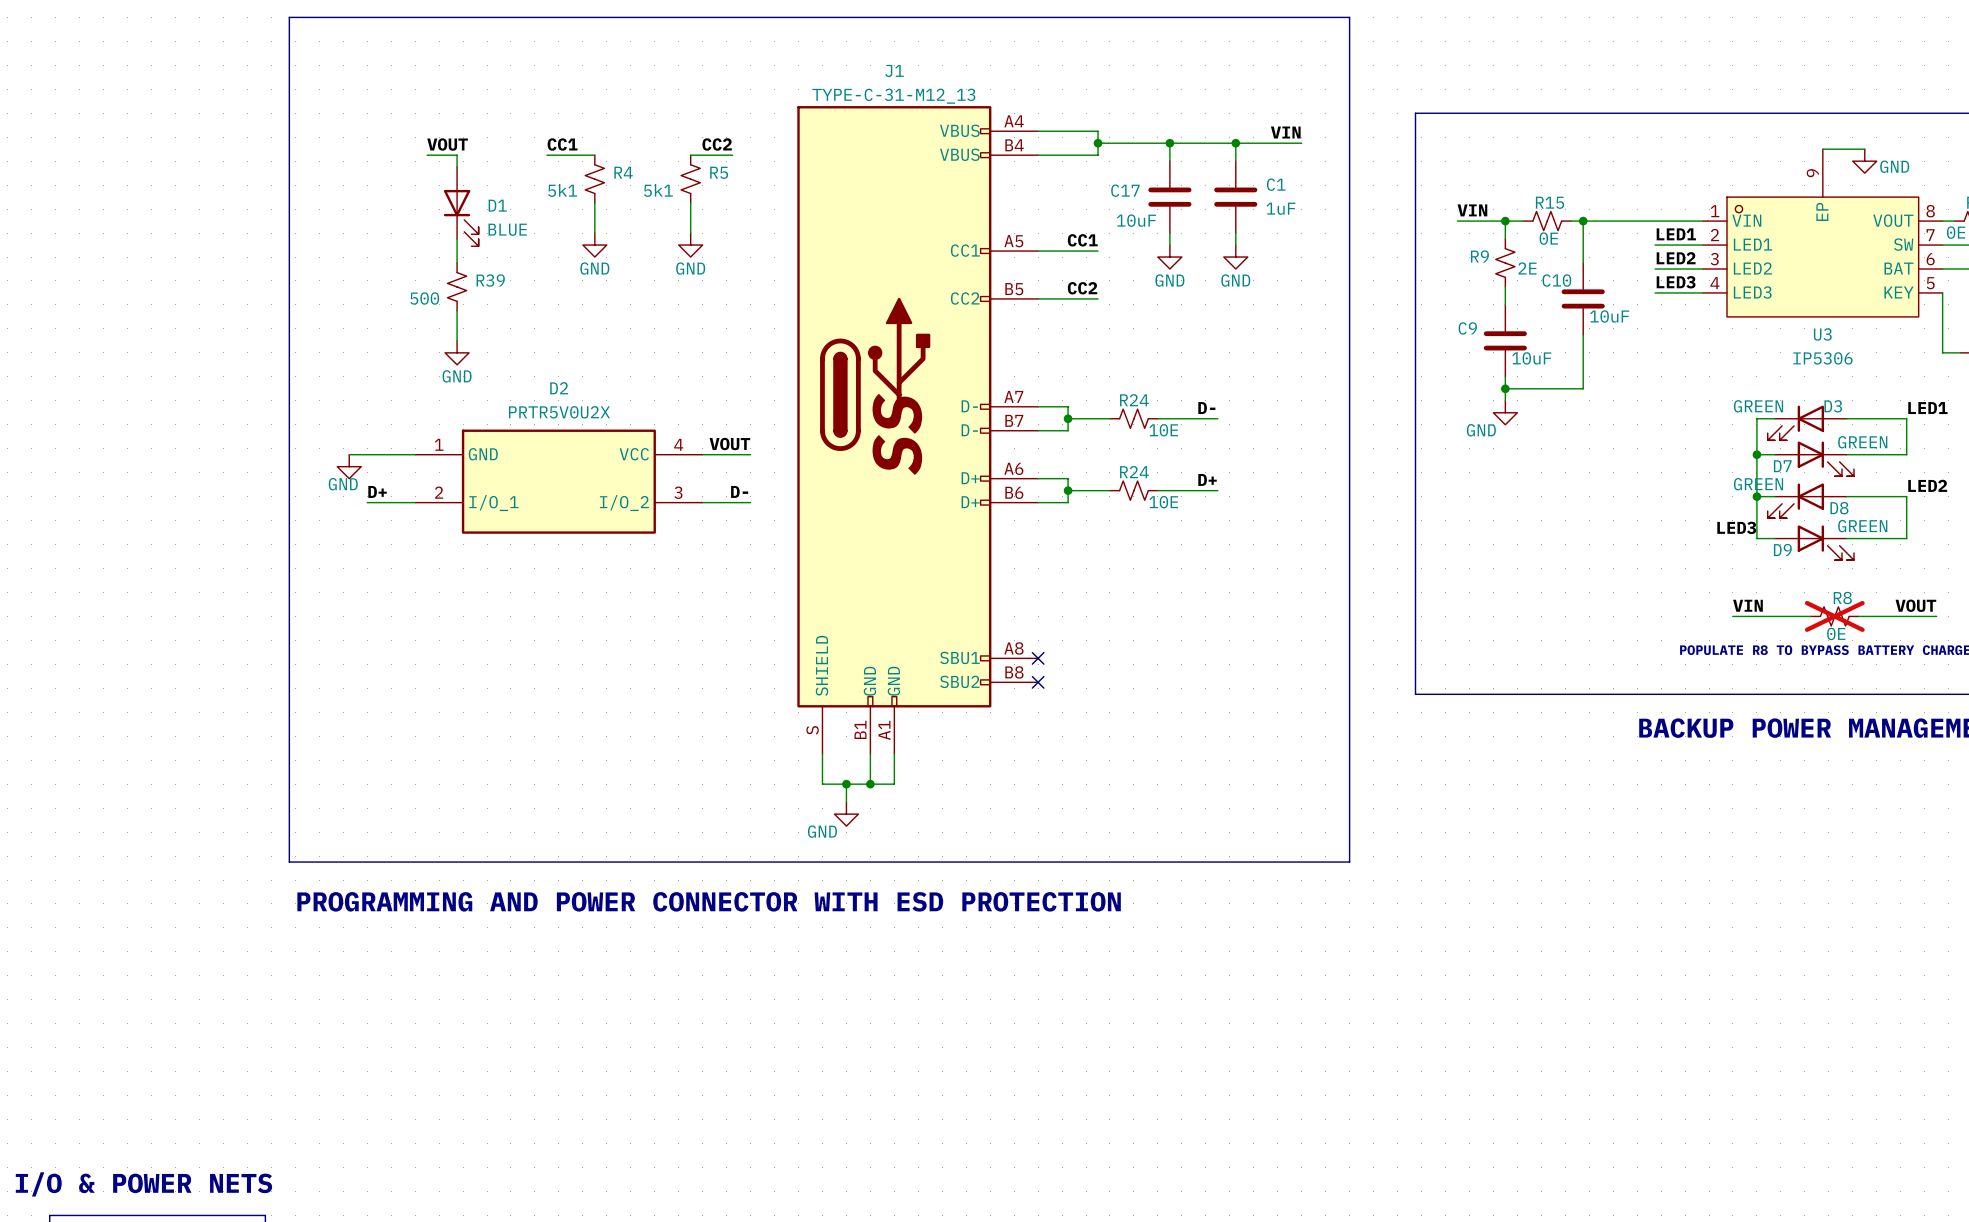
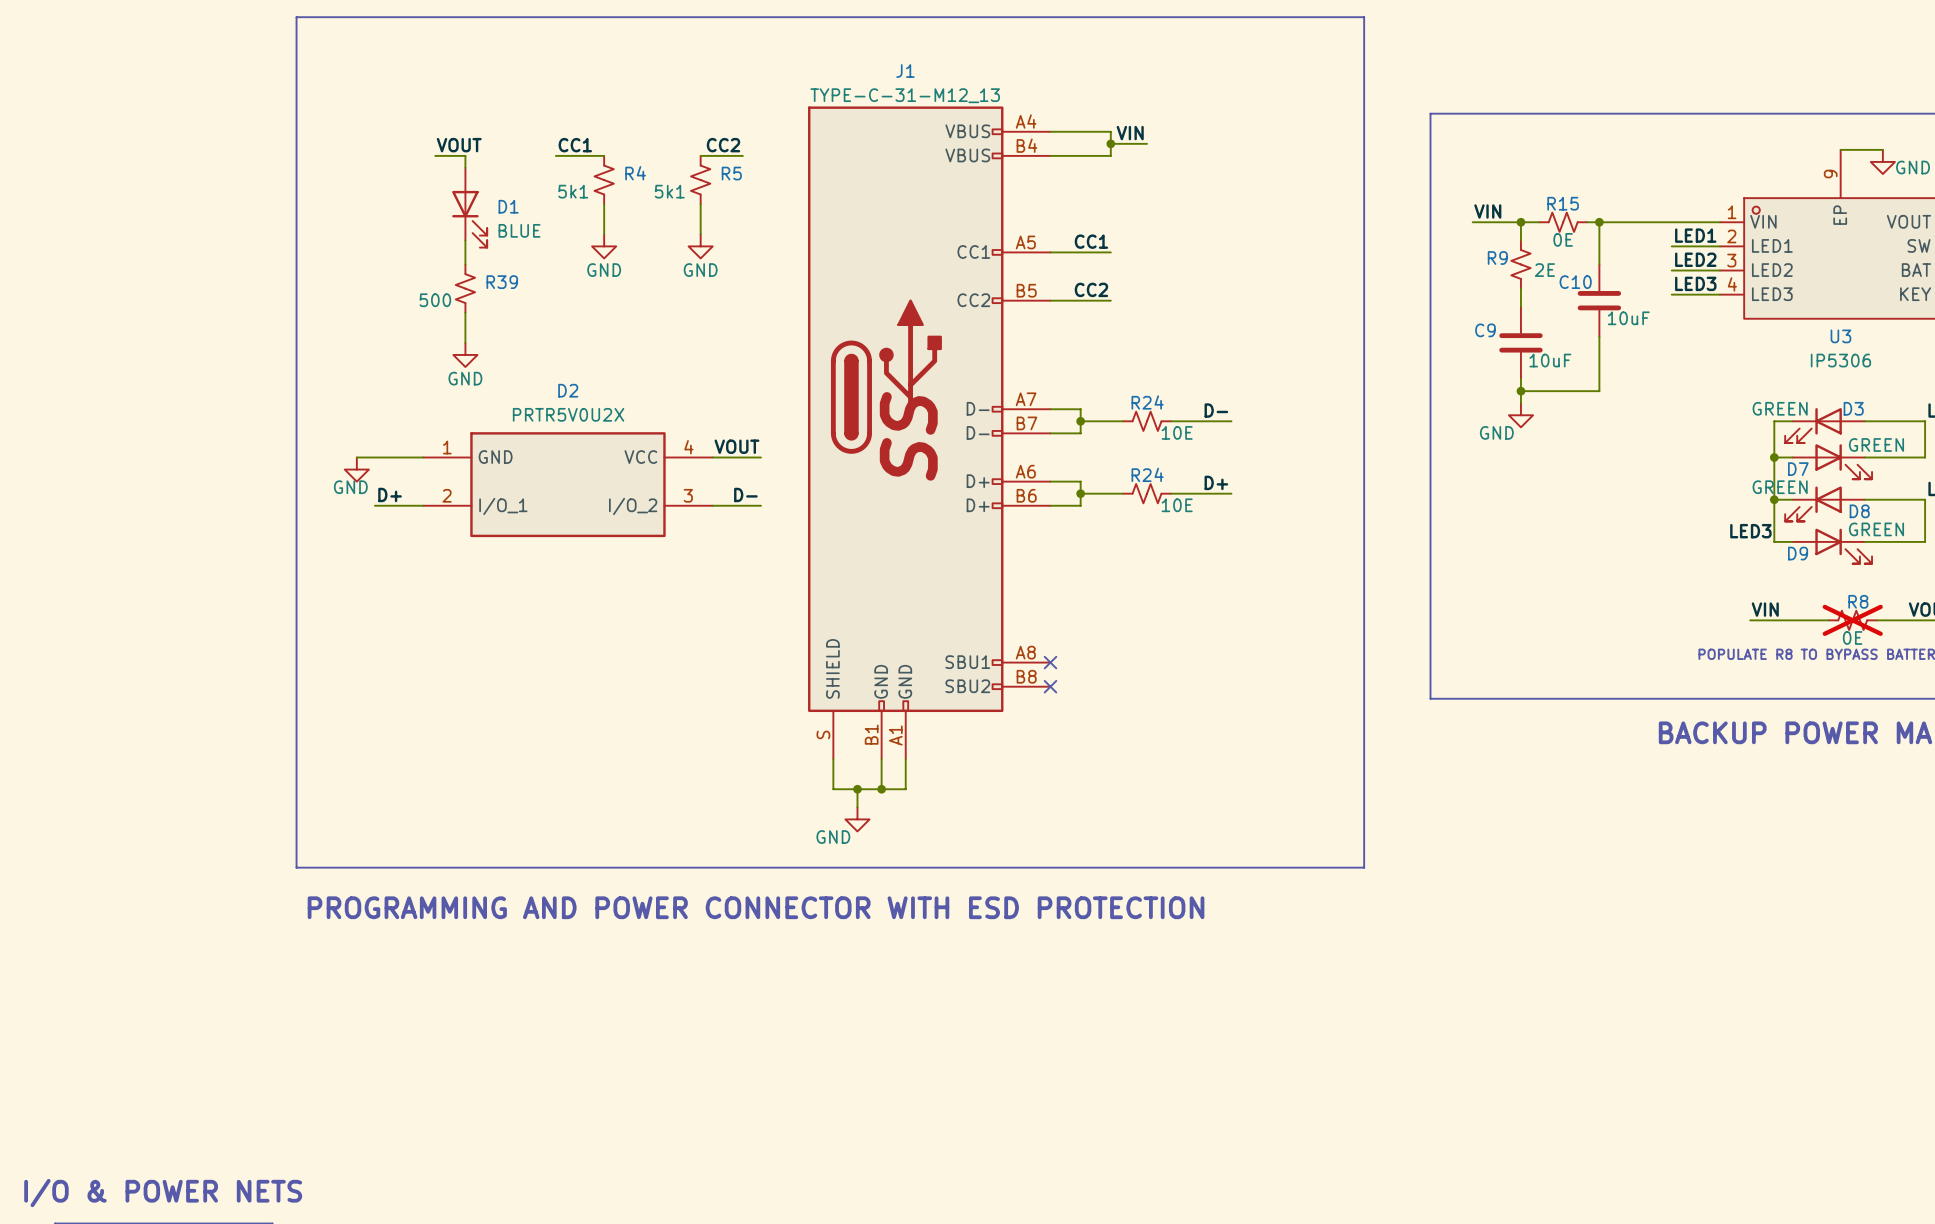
label position: VIN (1285, 132) -> VIN (1130, 133)
wire: (1133, 143) (1301, 143) -> none
wire: (1169, 143) (1169, 161) -> none
junction: (1169, 143) -> none
wire: (1235, 143) (1235, 161) -> none
junction: (1235, 143) -> none
C17: 10uF (1169, 197) -> none
C1: 1uF (1235, 197) -> none
wire: (1169, 233) (1169, 245) -> none
wire: (1235, 233) (1235, 245) -> none
power symbol: GND (1169, 257) -> none
power symbol: GND (1235, 257) -> none

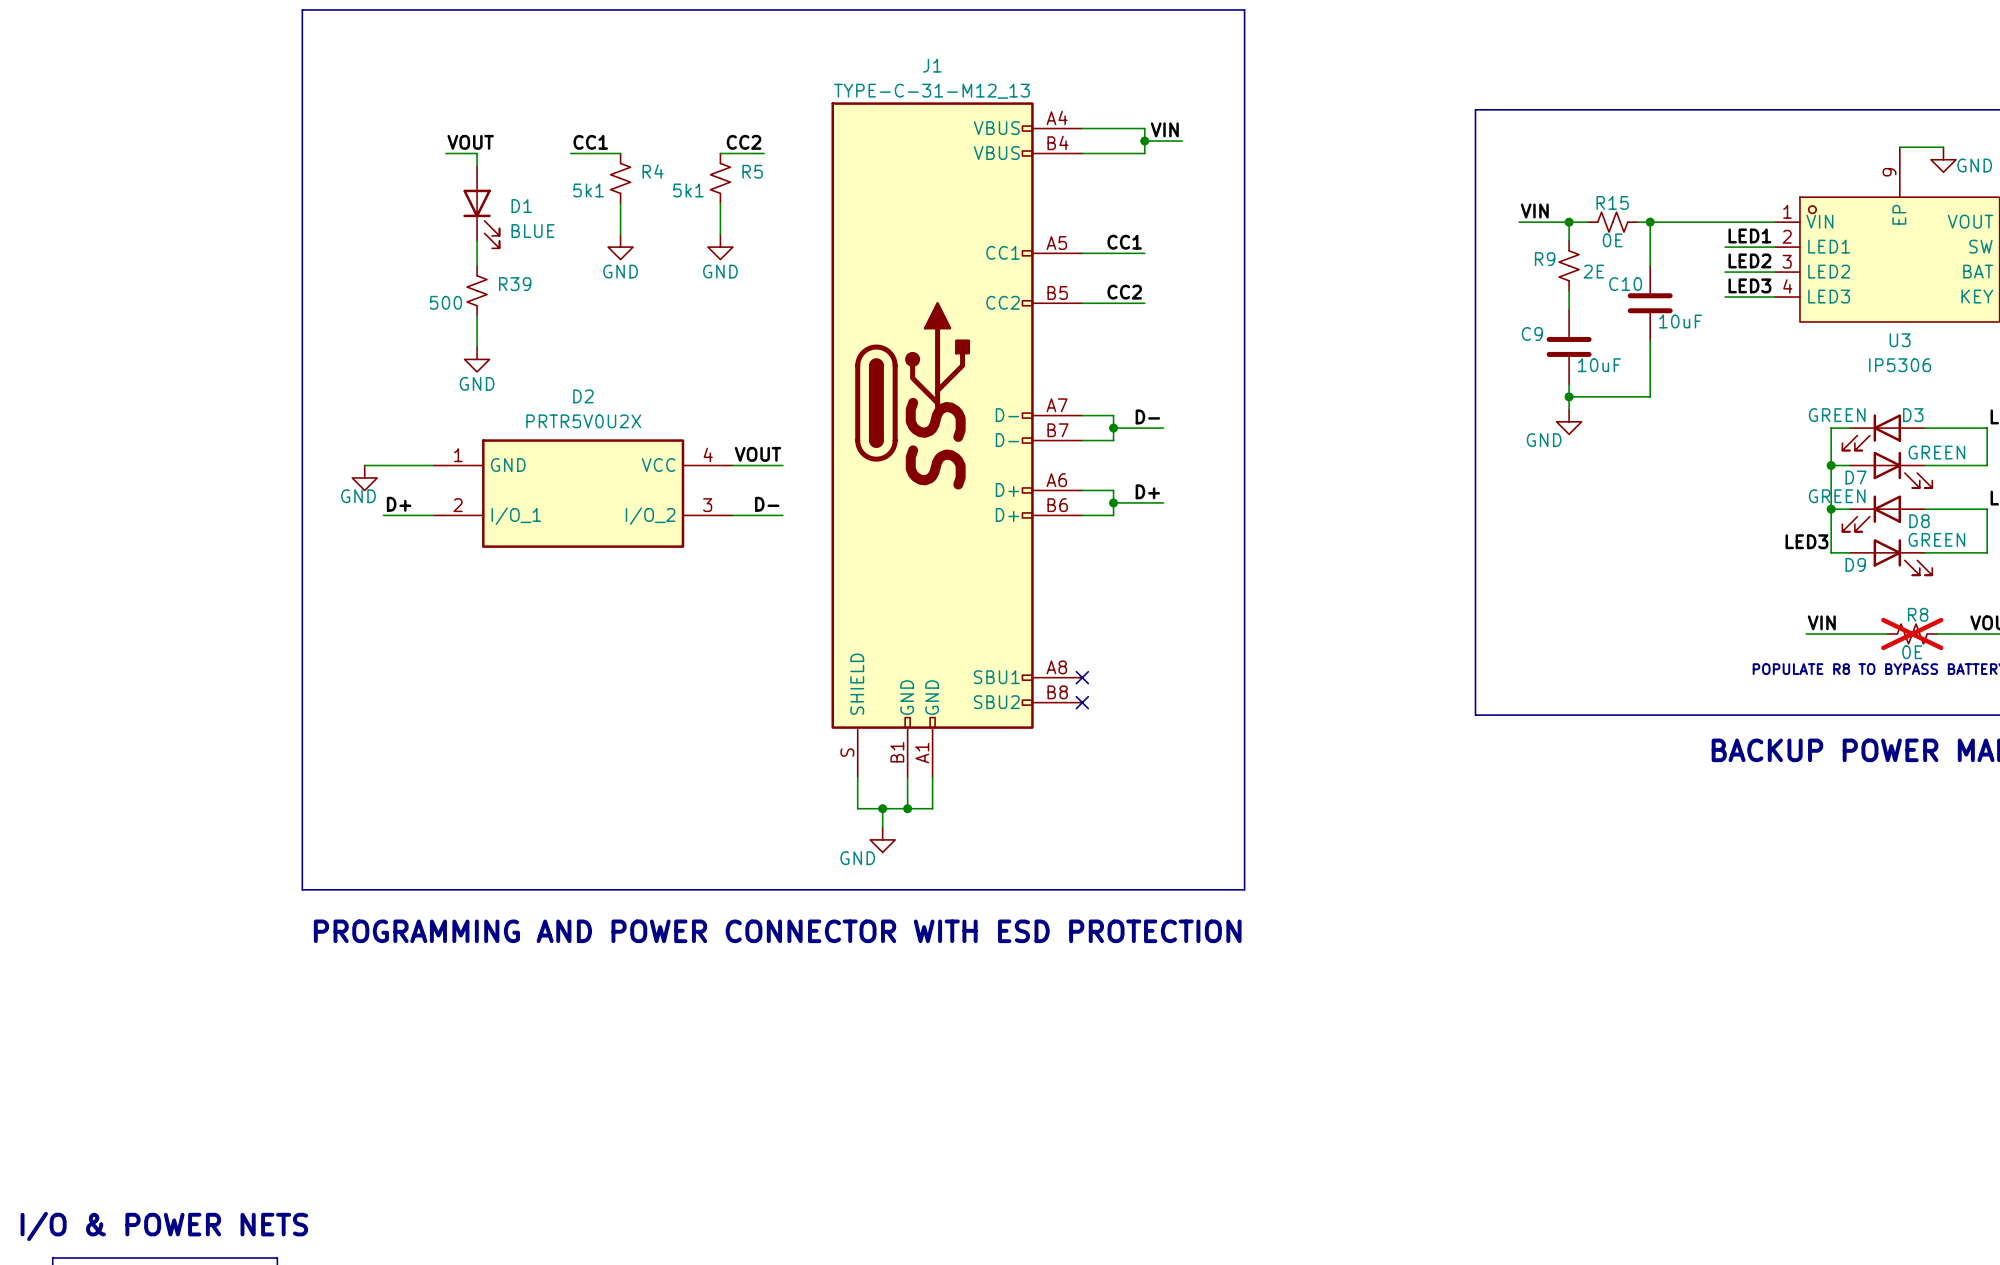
bus: (1207, 17) (1364, 17) (1364, 867) (1207, 867) -> (1244, 9) (1244, 889)
label position: D- (1216, 410) -> D- (1147, 416)
R24: 10E (1147, 421) -> none
wire: (1171, 421) (1231, 421) -> none
label position: D+ (1216, 482) -> D+ (1147, 491)
R24: 10E (1147, 493) -> none
wire: (1171, 493) (1231, 493) -> none

